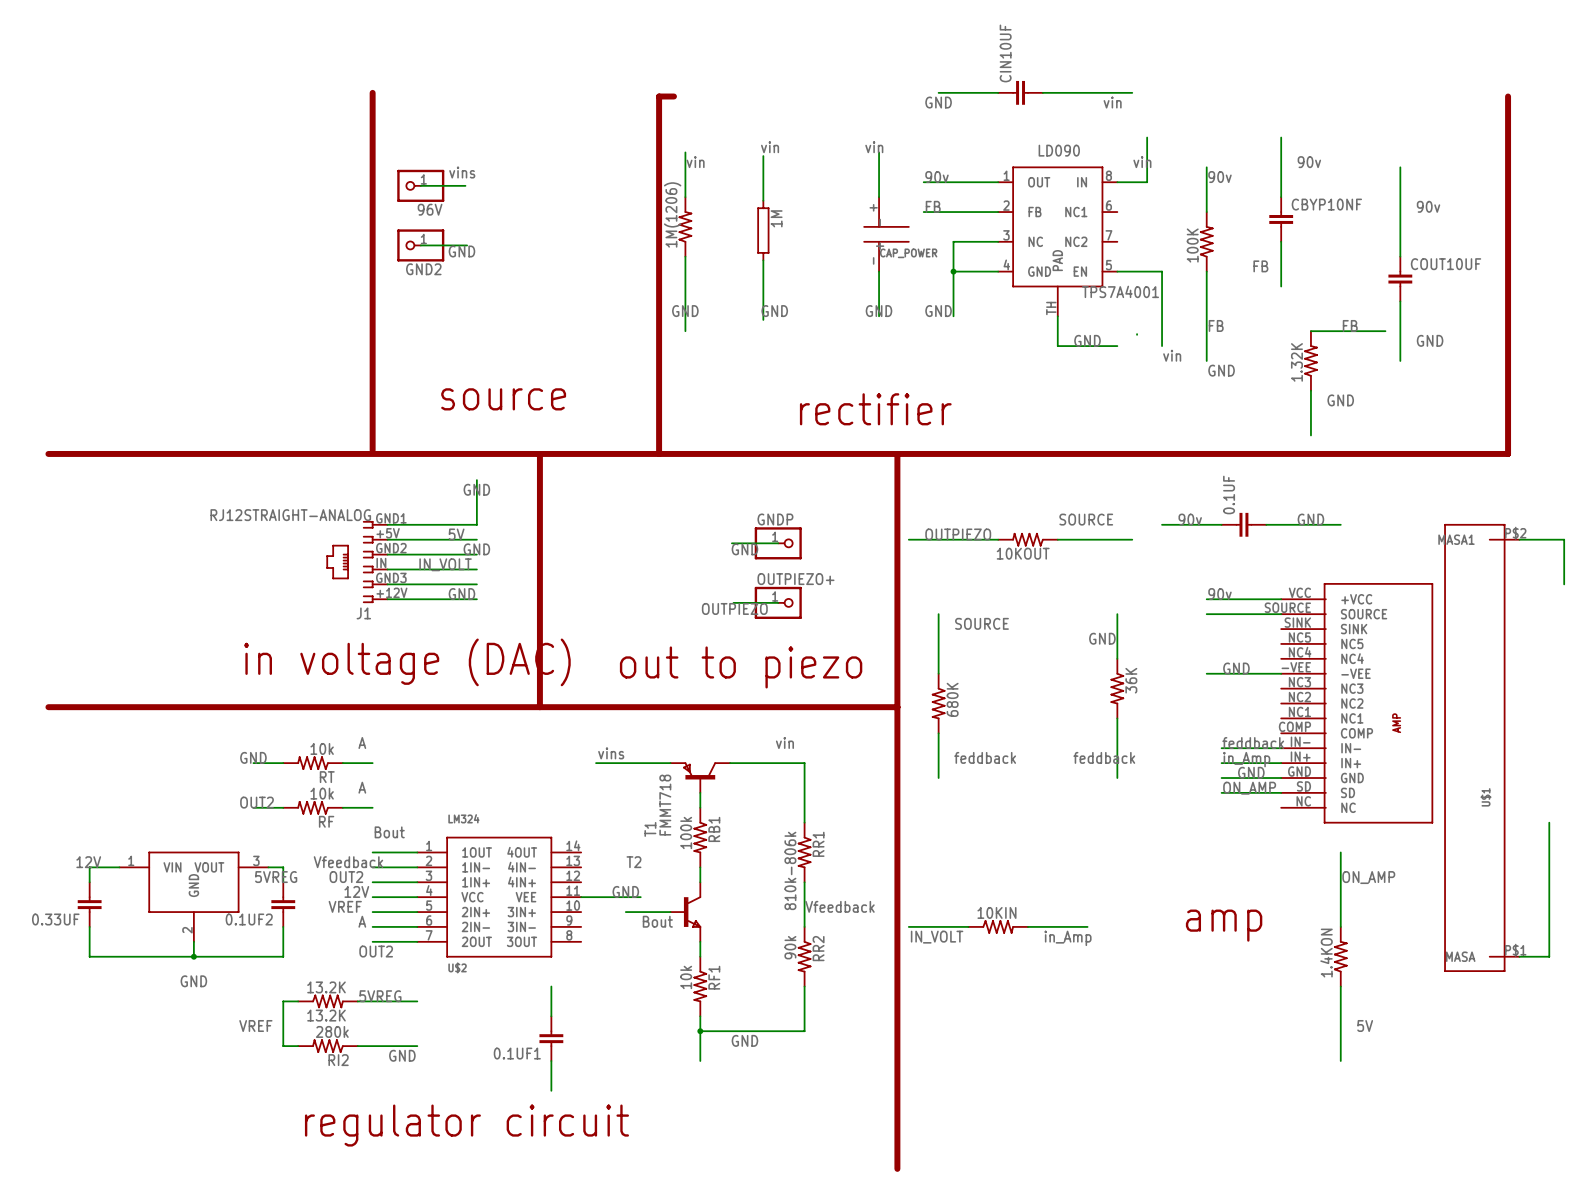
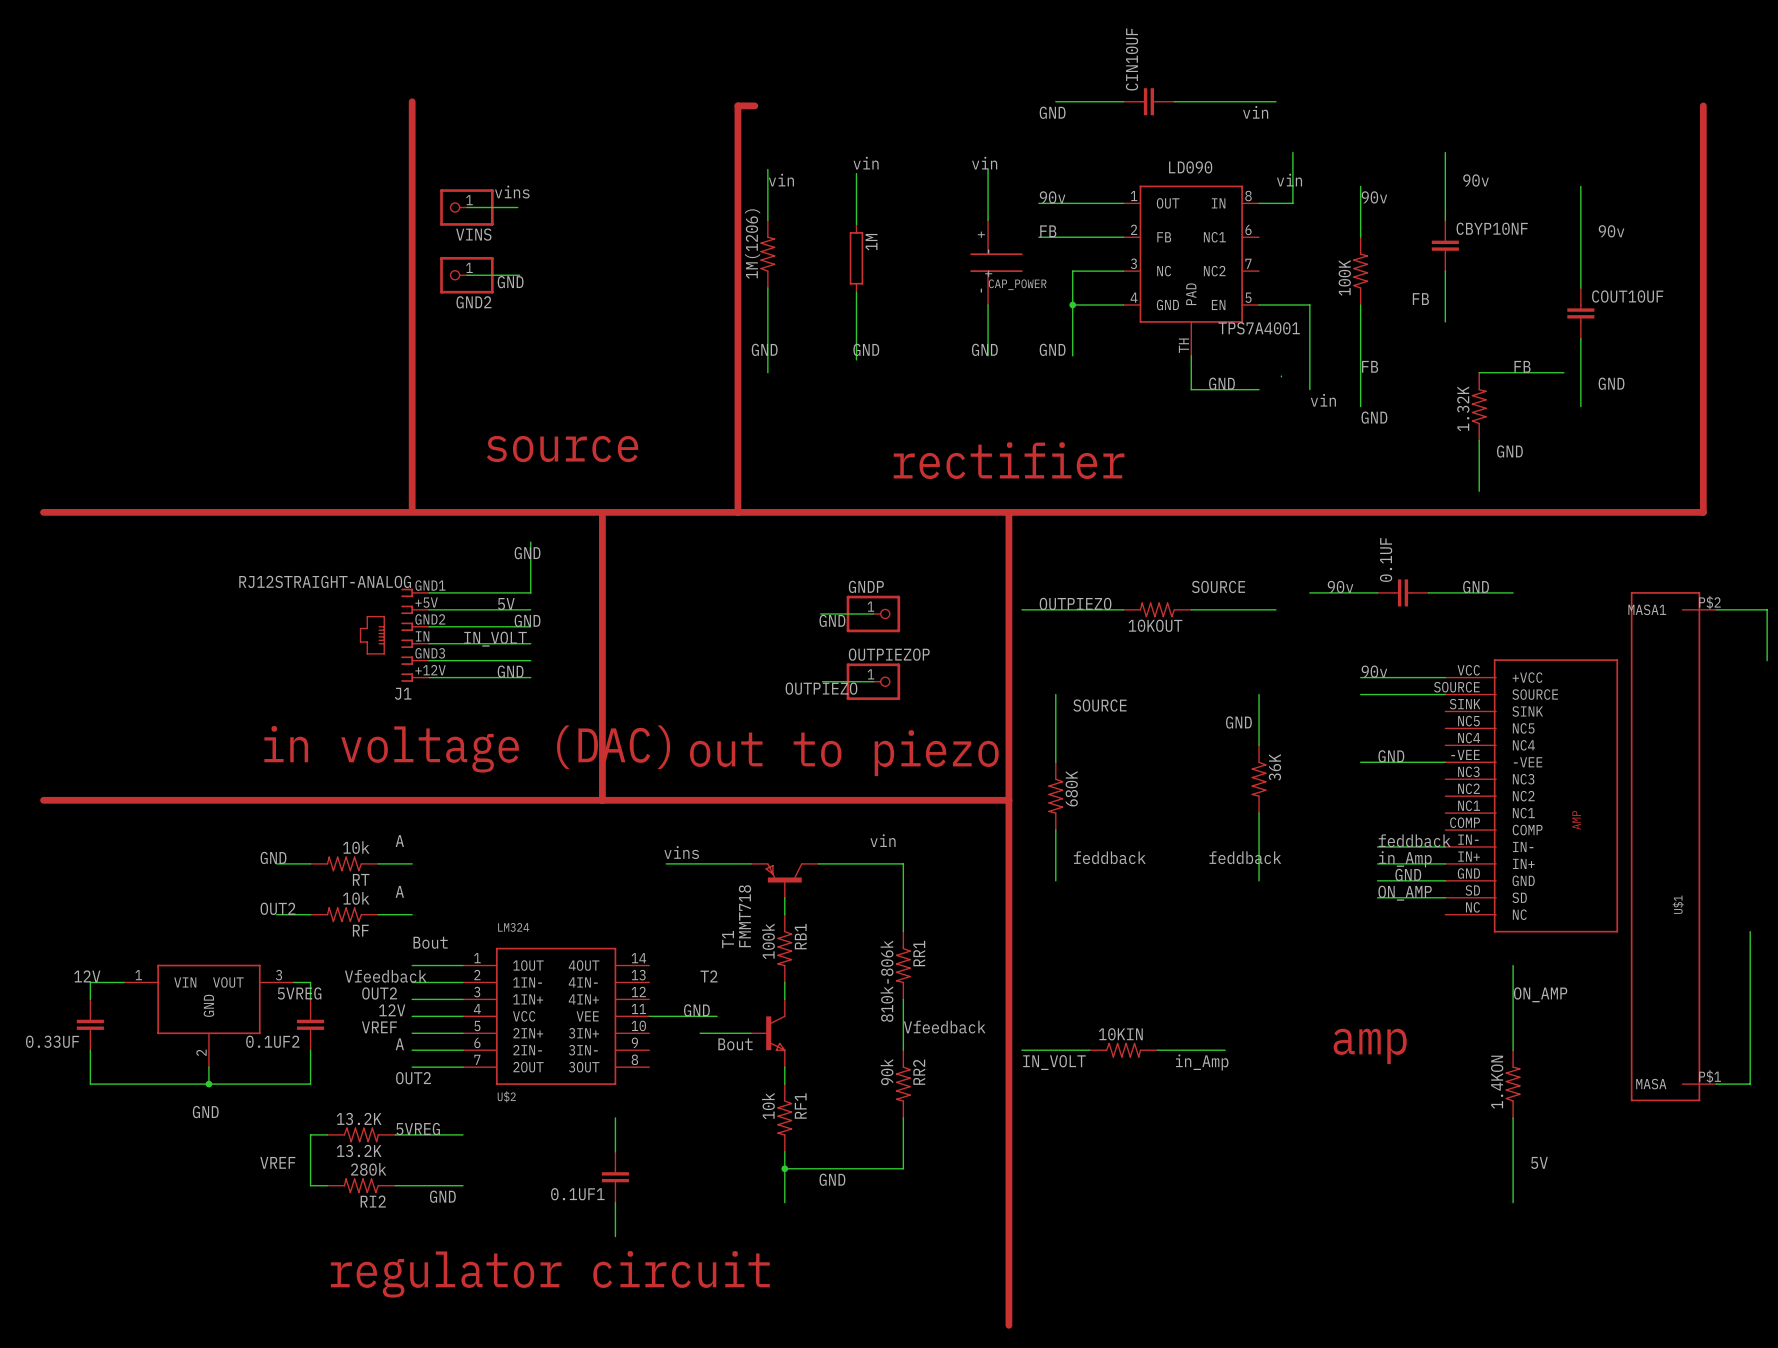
96V name: 96V (430, 209) -> VINS (473, 234)
OUTPIEZO+ name: OUTPIEZO+ (795, 579) -> OUTPIEZOP (889, 654)

